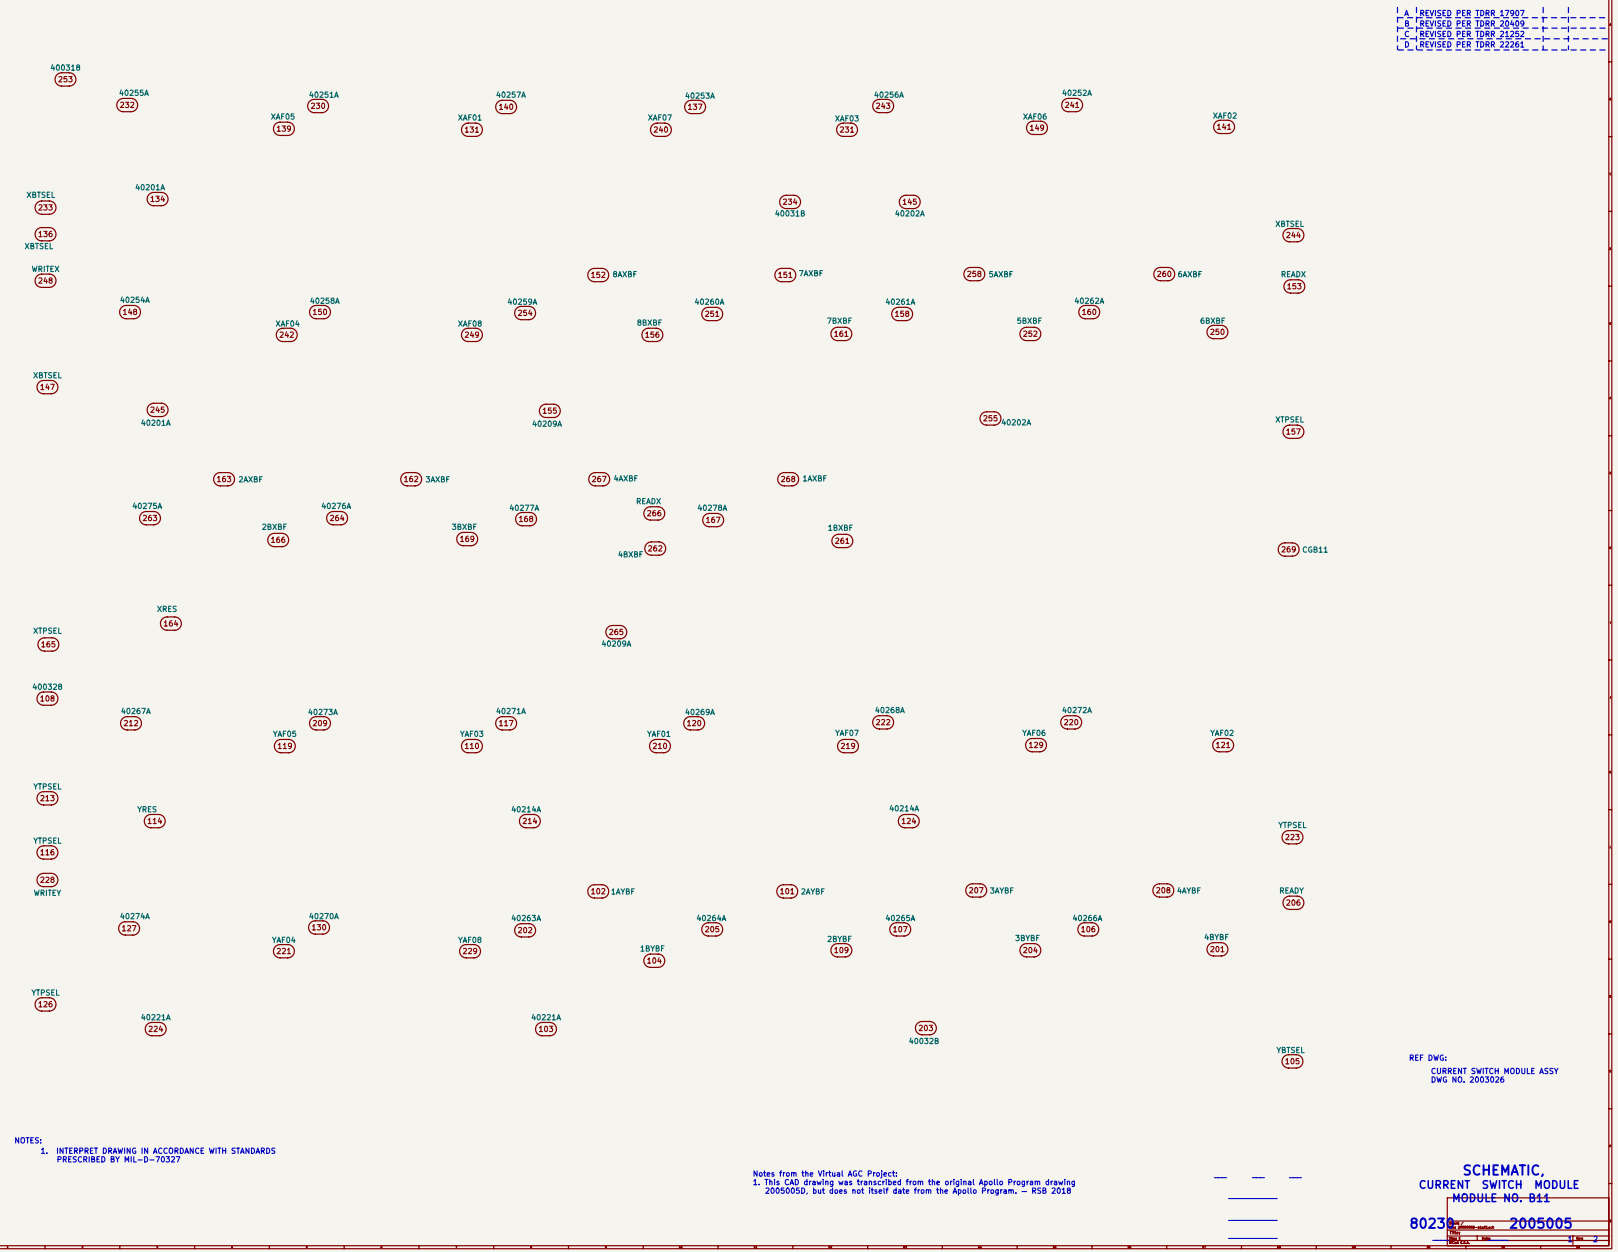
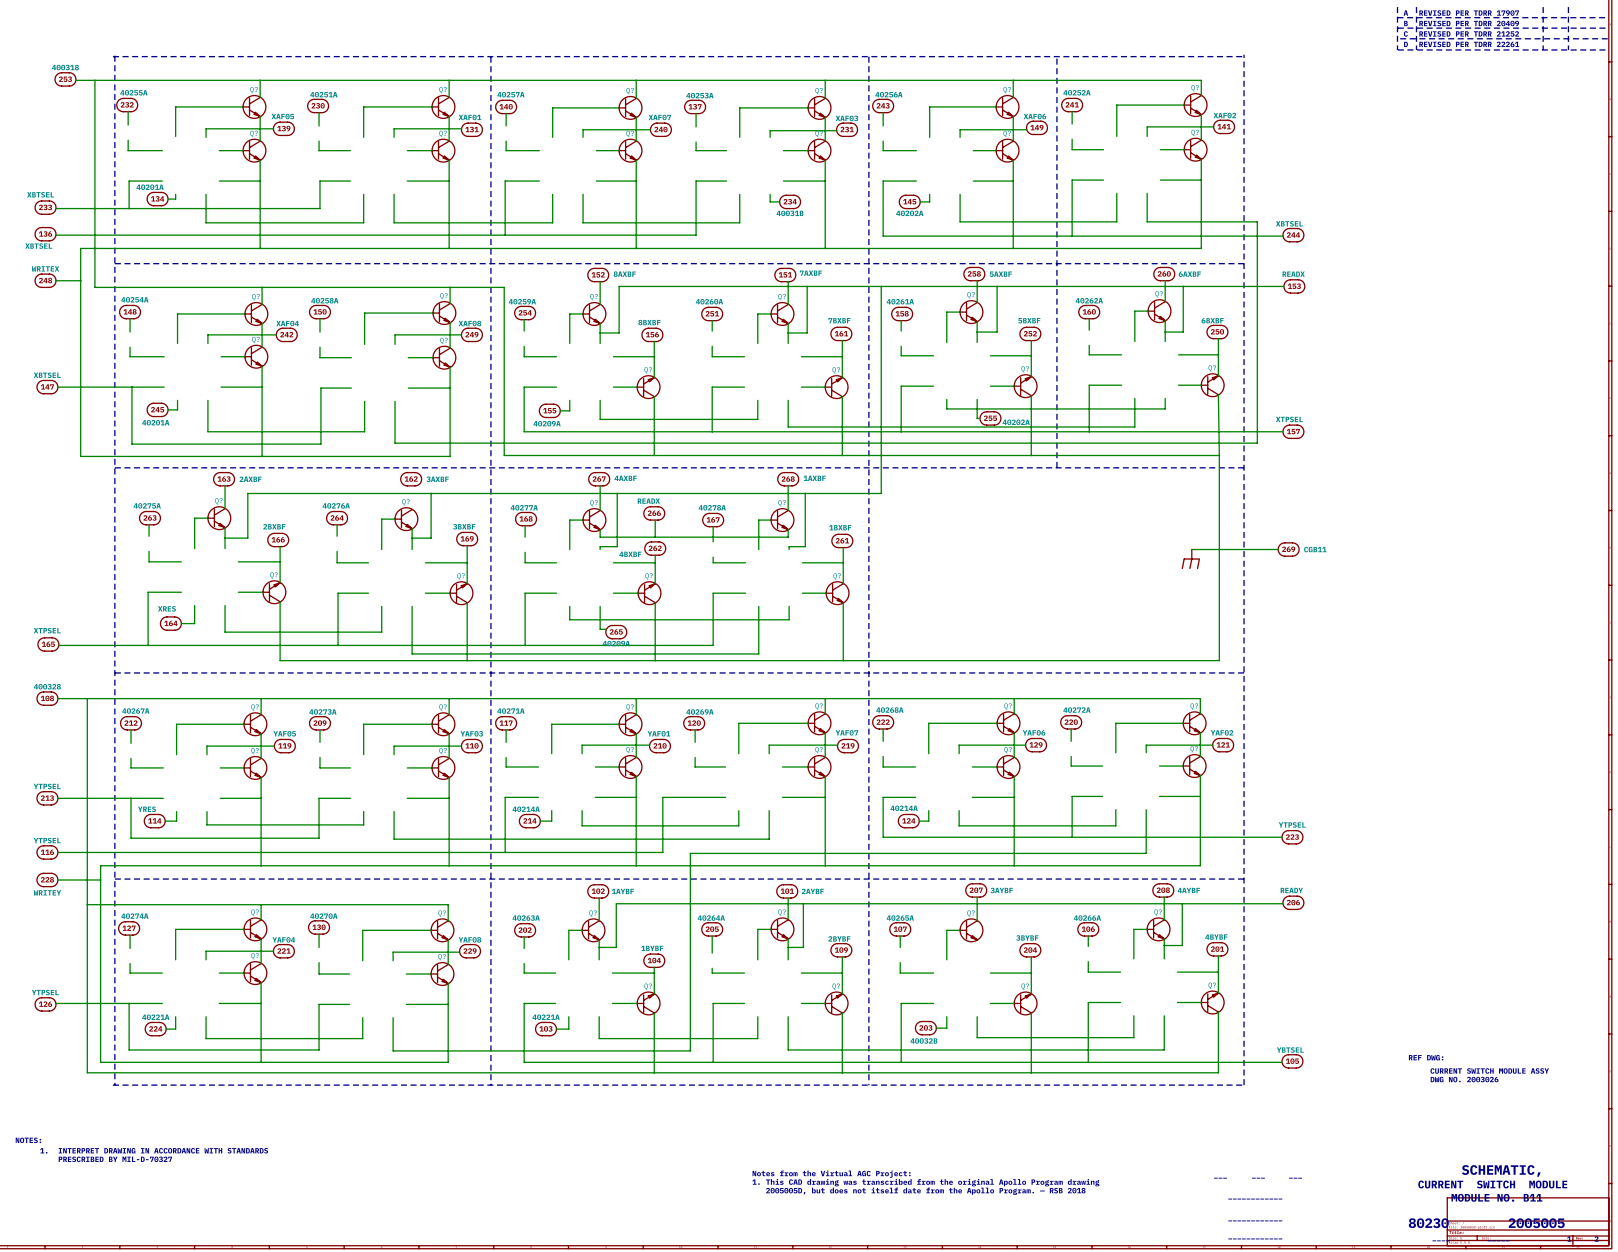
line: none -> (1244, 54) (1244, 1085) (112, 1085)
line: none -> (114, 55) (114, 1085)
line: none -> (112, 56) (1244, 56)
line: none -> (490, 56) (490, 1085)
line: none -> (868, 56) (868, 1085)
line: none -> (1056, 56) (1056, 467)
wire: none -> (75, 80) (1201, 80) (1201, 95)
wire: none -> (94, 80) (94, 287) (504, 287) (504, 455) (1219, 455)
wire: none -> (260, 80) (260, 97)
wire: none -> (449, 80) (449, 97)
wire: none -> (636, 80) (636, 98)
wire: none -> (825, 80) (825, 98)
wire: none -> (1013, 80) (1013, 97)
wire: none -> (1184, 105) (1116, 105) (1116, 136)
part: none -> (1195, 105)
wire: none -> (243, 106) (175, 106) (175, 136)
part: none -> (254, 106)
wire: none -> (432, 106) (363, 106) (363, 137)
part: none -> (443, 106)
wire: none -> (996, 106) (929, 106) (929, 137)
part: none -> (1007, 106)
wire: none -> (619, 107) (552, 107) (552, 137)
part: none -> (630, 107)
wire: none -> (808, 107) (739, 107) (739, 137)
part: none -> (819, 107)
wire: none -> (128, 111) (128, 125)
wire: none -> (1072, 111) (1072, 124)
wire: none -> (319, 112) (319, 125)
wire: none -> (883, 112) (883, 125)
wire: none -> (506, 113) (506, 125)
wire: none -> (696, 113) (696, 126)
wire: none -> (1201, 114) (1201, 140)
wire: none -> (260, 116) (260, 141)
wire: none -> (449, 116) (449, 141)
wire: none -> (1013, 116) (1013, 129)
wire: none -> (636, 117) (636, 141)
wire: none -> (825, 117) (825, 141)
wire: none -> (1213, 126) (1147, 126) (1147, 136)
wire: none -> (273, 128) (206, 128) (206, 137)
wire: none -> (461, 128) (394, 128) (394, 137)
wire: none -> (650, 129) (583, 129) (583, 137)
wire: none -> (1026, 129) (960, 129) (960, 137)
wire: none -> (836, 130) (770, 130) (770, 137)
wire: none -> (1013, 130) (1013, 141)
wire: none -> (1072, 139) (1072, 149) (1103, 149)
wire: none -> (128, 140) (128, 150) (162, 150)
wire: none -> (319, 141) (319, 150) (350, 150)
wire: none -> (506, 141) (506, 150) (539, 150)
wire: none -> (883, 141) (883, 150) (916, 150)
wire: none -> (696, 142) (696, 150) (726, 150)
wire: none -> (1160, 149) (1184, 149)
part: none -> (1195, 149)
wire: none -> (219, 150) (243, 150)
part: none -> (254, 150)
wire: none -> (407, 150) (432, 150)
part: none -> (443, 150)
wire: none -> (596, 150) (619, 150)
part: none -> (630, 150)
wire: none -> (783, 150) (808, 150)
part: none -> (819, 150)
wire: none -> (973, 150) (996, 150)
part: none -> (1007, 150)
wire: none -> (1201, 159) (1201, 248) (80, 248) (80, 456) (450, 456) (450, 367)
wire: none -> (260, 160) (260, 248)
wire: none -> (449, 160) (449, 248)
wire: none -> (636, 160) (636, 248)
wire: none -> (825, 160) (825, 248)
wire: none -> (1013, 160) (1013, 248)
wire: none -> (1103, 180) (1072, 180) (1072, 236)
wire: none -> (1160, 180) (1201, 180)
wire: none -> (162, 181) (129, 181) (129, 208)
wire: none -> (219, 181) (260, 181)
wire: none -> (350, 181) (319, 181) (319, 208) (55, 208)
wire: none -> (407, 181) (449, 181)
wire: none -> (539, 181) (505, 181) (505, 235)
wire: none -> (596, 181) (636, 181)
wire: none -> (726, 181) (696, 181) (696, 235) (55, 235)
wire: none -> (783, 181) (825, 181)
wire: none -> (916, 181) (883, 181) (883, 236) (1282, 236)
wire: none -> (973, 181) (1013, 181)
wire: none -> (1116, 193) (1116, 221) (960, 221) (960, 194)
wire: none -> (1147, 193) (1147, 221) (1257, 221) (1257, 443) (395, 443) (395, 401)
wire: none -> (175, 194) (175, 199) (168, 199)
wire: none -> (206, 194) (206, 222) (363, 222) (363, 194)
wire: none -> (394, 194) (394, 222) (552, 222) (552, 194)
wire: none -> (583, 194) (583, 222) (739, 222) (739, 194)
wire: none -> (770, 194) (770, 201) (779, 201)
wire: none -> (929, 194) (929, 201) (920, 201)
line: none -> (114, 263) (1244, 263)
wire: none -> (55, 280) (80, 280)
wire: none -> (977, 280) (977, 302)
wire: none -> (1165, 280) (1165, 301)
wire: none -> (600, 281) (600, 304)
wire: none -> (787, 281) (788, 304)
wire: none -> (807, 286) (807, 332) (788, 332)
wire: none -> (881, 286) (881, 493) (247, 493) (247, 538) (225, 538)
wire: none -> (997, 286) (997, 332) (977, 332)
wire: none -> (1183, 286) (1183, 332) (1165, 332)
wire: none -> (1283, 286) (619, 286) (619, 332) (600, 332)
wire: none -> (262, 287) (262, 304)
wire: none -> (450, 287) (450, 303)
wire: none -> (1148, 311) (1134, 311) (1134, 341)
part: none -> (1159, 311)
wire: none -> (960, 312) (946, 312) (946, 342)
part: none -> (971, 312)
wire: none -> (244, 313) (177, 313) (177, 343)
part: none -> (256, 313)
wire: none -> (433, 313) (364, 313) (364, 344)
part: none -> (444, 313)
wire: none -> (583, 313) (569, 313) (569, 343)
part: none -> (594, 313)
wire: none -> (771, 313) (757, 313) (757, 343)
part: none -> (782, 313)
wire: none -> (130, 318) (130, 332)
wire: none -> (319, 318) (319, 332)
wire: none -> (1089, 318) (1089, 330)
wire: none -> (524, 319) (524, 331)
wire: none -> (712, 320) (712, 331)
wire: none -> (901, 320) (901, 331)
wire: none -> (1165, 320) (1165, 341)
wire: none -> (977, 321) (977, 342)
wire: none -> (450, 322) (450, 348)
wire: none -> (262, 323) (262, 347)
wire: none -> (600, 323) (600, 343)
wire: none -> (788, 323) (788, 343)
wire: none -> (276, 334) (207, 334) (207, 343)
wire: none -> (461, 334) (395, 334) (395, 344)
wire: none -> (1218, 338) (1218, 375)
wire: none -> (842, 340) (842, 377)
wire: none -> (1031, 340) (1031, 376)
wire: none -> (654, 341) (654, 377)
wire: none -> (1089, 345) (1089, 354) (1121, 354)
wire: none -> (524, 346) (524, 356) (556, 356)
wire: none -> (712, 346) (712, 356) (744, 356)
wire: none -> (901, 346) (901, 355) (933, 355)
wire: none -> (130, 347) (130, 356) (164, 356)
wire: none -> (319, 347) (319, 357) (351, 357)
wire: none -> (1178, 354) (1218, 354)
wire: none -> (990, 355) (1031, 355)
wire: none -> (221, 356) (244, 356)
part: none -> (256, 356)
wire: none -> (613, 356) (654, 356)
wire: none -> (801, 356) (842, 356)
wire: none -> (408, 357) (433, 357)
part: none -> (444, 357)
wire: none -> (262, 366) (262, 456)
wire: none -> (1121, 385) (1089, 385) (1089, 431)
wire: none -> (1178, 385) (1201, 385)
part: none -> (1212, 385)
wire: none -> (933, 386) (901, 386) (901, 431)
wire: none -> (990, 386) (1014, 386)
part: none -> (1025, 386)
wire: none -> (57, 387) (164, 387)
wire: none -> (131, 387) (131, 444) (320, 444) (320, 388) (351, 388)
wire: none -> (221, 387) (262, 387)
wire: none -> (556, 387) (524, 387) (524, 431) (1282, 431)
wire: none -> (613, 387) (637, 387)
part: none -> (648, 387)
wire: none -> (744, 387) (712, 387) (712, 431)
wire: none -> (801, 387) (825, 387)
part: none -> (836, 387)
wire: none -> (408, 388) (450, 388)
wire: none -> (1218, 394) (1219, 455)
wire: none -> (1031, 395) (1031, 455)
wire: none -> (654, 396) (654, 455)
wire: none -> (842, 396) (842, 455)
wire: none -> (1134, 398) (1134, 427) (788, 427) (788, 400)
wire: none -> (1165, 398) (1165, 408) (946, 408) (946, 399)
wire: none -> (977, 399) (977, 418) (979, 418)
wire: none -> (177, 400) (177, 409) (168, 409)
wire: none -> (207, 400) (207, 431) (364, 431) (364, 401)
wire: none -> (569, 400) (569, 410) (560, 410)
wire: none -> (600, 400) (600, 419) (757, 419) (757, 400)
wire: none -> (1219, 455) (1219, 660) (280, 660) (280, 601)
line: none -> (114, 467) (1244, 467)
wire: none -> (225, 485) (225, 508)
wire: none -> (600, 485) (600, 510)
wire: none -> (788, 485) (788, 510)
wire: none -> (431, 493) (431, 538) (412, 538)
wire: none -> (617, 493) (617, 546) (600, 546) (600, 549)
wire: none -> (805, 493) (805, 546) (789, 546) (789, 549)
wire: none -> (207, 518) (194, 518) (194, 548)
part: none -> (219, 518)
wire: none -> (395, 519) (381, 519) (381, 549)
part: none -> (406, 519)
wire: none -> (583, 520) (569, 520) (569, 549)
part: none -> (594, 520)
wire: none -> (655, 520) (655, 537)
wire: none -> (771, 520) (758, 520) (758, 549)
part: none -> (782, 520)
wire: none -> (149, 524) (149, 536)
wire: none -> (337, 524) (337, 536)
wire: none -> (525, 525) (525, 537)
wire: none -> (713, 526) (713, 541)
wire: none -> (225, 527) (225, 548)
wire: none -> (412, 528) (412, 549)
wire: none -> (600, 529) (600, 537) (788, 537) (788, 529)
wire: none -> (467, 545) (467, 583)
wire: none -> (280, 546) (280, 582)
wire: none -> (843, 547) (843, 583)
wire: none -> (1191, 549) (1278, 549)
wire: none -> (149, 551) (149, 561) (181, 561)
wire: none -> (337, 551) (337, 562) (368, 562)
wire: none -> (525, 552) (525, 562) (556, 562)
wire: none -> (655, 555) (655, 583)
wire: none -> (713, 557) (713, 562) (745, 562)
part: none -> (1190, 559)
wire: none -> (238, 561) (280, 561)
wire: none -> (425, 562) (467, 562)
wire: none -> (613, 562) (655, 562)
wire: none -> (802, 562) (843, 562)
wire: none -> (181, 592) (148, 592) (148, 645)
wire: none -> (238, 592) (263, 592)
part: none -> (274, 592)
wire: none -> (368, 593) (338, 593) (338, 645)
wire: none -> (425, 593) (450, 593)
part: none -> (461, 593)
wire: none -> (556, 593) (525, 593) (525, 645)
wire: none -> (613, 593) (638, 593)
part: none -> (649, 593)
wire: none -> (745, 593) (713, 593) (713, 645) (58, 645)
wire: none -> (802, 593) (826, 593)
part: none -> (837, 593)
wire: none -> (467, 602) (467, 660)
wire: none -> (655, 602) (655, 660)
wire: none -> (843, 602) (843, 660)
wire: none -> (194, 605) (194, 623) (181, 623)
wire: none -> (225, 605) (225, 632) (381, 632) (381, 606)
wire: none -> (412, 606) (412, 653) (758, 653) (758, 606)
wire: none -> (569, 606) (569, 619) (789, 619) (789, 606)
wire: none -> (600, 606) (600, 629) (605, 629)
line: none -> (114, 672) (1244, 672)
wire: none -> (57, 698) (1200, 698) (1200, 713)
wire: none -> (87, 698) (87, 1072) (1218, 1072) (1218, 1012)
wire: none -> (261, 698) (261, 714)
wire: none -> (449, 698) (449, 714)
wire: none -> (636, 698) (636, 714)
wire: none -> (825, 698) (825, 713)
wire: none -> (1014, 698) (1014, 713)
wire: none -> (808, 723) (738, 723) (738, 753)
part: none -> (819, 723)
wire: none -> (997, 723) (928, 723) (928, 753)
part: none -> (1008, 723)
wire: none -> (1183, 723) (1115, 723) (1115, 752)
part: none -> (1194, 723)
wire: none -> (244, 724) (176, 724) (176, 754)
part: none -> (255, 724)
wire: none -> (432, 724) (363, 724) (363, 754)
part: none -> (443, 724)
wire: none -> (619, 724) (551, 724) (551, 753)
part: none -> (630, 724)
wire: none -> (131, 729) (131, 743)
wire: none -> (319, 729) (319, 742)
wire: none -> (506, 729) (506, 742)
wire: none -> (695, 729) (695, 742)
wire: none -> (883, 729) (883, 741)
wire: none -> (1071, 729) (1071, 741)
wire: none -> (825, 732) (825, 757)
wire: none -> (1014, 732) (1014, 757)
wire: none -> (1200, 732) (1200, 756)
wire: none -> (261, 733) (261, 758)
wire: none -> (449, 733) (449, 758)
wire: none -> (636, 733) (636, 757)
wire: none -> (649, 745) (582, 745) (582, 753)
wire: none -> (837, 745) (769, 745) (769, 753)
wire: none -> (1025, 745) (959, 745) (959, 753)
wire: none -> (1212, 745) (1146, 745) (1146, 752)
wire: none -> (274, 746) (206, 746) (206, 754)
wire: none -> (461, 746) (394, 746) (394, 754)
wire: none -> (883, 756) (883, 766) (915, 766)
wire: none -> (1071, 756) (1071, 766) (1102, 766)
wire: none -> (319, 757) (319, 767) (350, 767)
wire: none -> (506, 757) (506, 766) (538, 766)
wire: none -> (695, 757) (695, 766) (725, 766)
wire: none -> (131, 758) (131, 767) (163, 767)
wire: none -> (595, 766) (619, 766)
part: none -> (630, 766)
wire: none -> (782, 766) (808, 766)
part: none -> (819, 766)
wire: none -> (972, 766) (997, 766)
part: none -> (1008, 766)
wire: none -> (1159, 766) (1183, 766)
part: none -> (1194, 766)
wire: none -> (220, 767) (244, 767)
part: none -> (255, 767)
wire: none -> (407, 767) (432, 767)
part: none -> (443, 767)
wire: none -> (1200, 775) (1200, 865) (100, 865) (100, 1062) (448, 1062) (448, 983)
wire: none -> (636, 776) (636, 865)
wire: none -> (825, 776) (825, 865)
wire: none -> (1014, 776) (1014, 865)
wire: none -> (261, 777) (261, 865)
wire: none -> (449, 777) (449, 865)
wire: none -> (1102, 796) (1072, 796) (1072, 837)
wire: none -> (1159, 796) (1200, 796)
wire: none -> (538, 797) (505, 797) (505, 852)
wire: none -> (595, 797) (636, 797)
wire: none -> (725, 797) (662, 797) (662, 852) (57, 852)
wire: none -> (782, 797) (825, 797)
wire: none -> (915, 797) (883, 797) (883, 837) (1282, 837)
wire: none -> (972, 797) (1014, 797)
wire: none -> (57, 798) (163, 798)
wire: none -> (131, 798) (131, 838) (319, 838) (319, 798) (350, 798)
wire: none -> (220, 798) (261, 798)
wire: none -> (407, 798) (449, 798)
wire: none -> (1115, 809) (1115, 825) (959, 825) (959, 810)
wire: none -> (1146, 809) (1146, 853) (690, 853) (690, 1050) (393, 1050) (393, 1017)
wire: none -> (551, 810) (551, 821) (540, 821)
wire: none -> (582, 810) (582, 825) (738, 825) (738, 810)
wire: none -> (769, 810) (769, 839) (394, 839) (394, 811)
wire: none -> (928, 810) (928, 821) (919, 821)
wire: none -> (176, 811) (176, 821) (165, 821)
wire: none -> (206, 811) (206, 824) (363, 824) (363, 811)
line: none -> (114, 879) (1244, 879)
wire: none -> (57, 880) (100, 880)
wire: none -> (977, 897) (977, 920)
wire: none -> (1164, 897) (1164, 919)
wire: none -> (599, 898) (599, 920)
wire: none -> (788, 898) (788, 918)
wire: none -> (803, 903) (803, 947) (788, 947)
wire: none -> (1182, 903) (1182, 945) (1164, 945)
wire: none -> (1282, 903) (616, 903) (616, 947) (599, 947)
wire: none -> (87, 904) (448, 904) (448, 920)
wire: none -> (261, 904) (261, 919)
wire: none -> (244, 929) (175, 929) (175, 959)
part: none -> (255, 929)
wire: none -> (771, 929) (757, 929) (757, 959)
part: none -> (782, 929)
wire: none -> (1147, 929) (1133, 929) (1133, 958)
part: none -> (1158, 929)
wire: none -> (431, 930) (362, 930) (362, 960)
part: none -> (442, 930)
wire: none -> (582, 930) (568, 930) (568, 959)
part: none -> (593, 930)
wire: none -> (960, 930) (946, 930) (946, 959)
part: none -> (971, 930)
wire: none -> (319, 934) (319, 947)
wire: none -> (130, 935) (130, 948)
wire: none -> (524, 936) (524, 948)
wire: none -> (712, 936) (712, 953)
wire: none -> (900, 936) (900, 947)
wire: none -> (1088, 936) (1088, 946)
wire: none -> (261, 938) (261, 963)
wire: none -> (788, 938) (788, 959)
wire: none -> (1164, 938) (1164, 958)
wire: none -> (448, 939) (448, 964)
wire: none -> (599, 939) (599, 959)
wire: none -> (273, 951) (206, 951) (206, 959)
wire: none -> (459, 952) (393, 952) (393, 960)
wire: none -> (1218, 955) (1218, 993)
wire: none -> (842, 956) (842, 993)
wire: none -> (1031, 956) (1031, 993)
wire: none -> (1088, 961) (1088, 972) (1120, 972)
wire: none -> (319, 962) (319, 974) (349, 974)
wire: none -> (900, 962) (900, 973) (933, 973)
wire: none -> (130, 963) (130, 973) (162, 973)
wire: none -> (524, 963) (524, 973) (555, 973)
wire: none -> (654, 967) (654, 993)
wire: none -> (712, 968) (712, 973) (744, 973)
wire: none -> (1177, 972) (1218, 972)
wire: none -> (219, 973) (244, 973)
part: none -> (255, 973)
wire: none -> (612, 973) (654, 973)
wire: none -> (801, 973) (842, 973)
wire: none -> (990, 973) (1031, 973)
wire: none -> (406, 974) (431, 974)
part: none -> (442, 974)
wire: none -> (261, 982) (261, 1062)
wire: none -> (1120, 1002) (1088, 1002) (1088, 1062)
wire: none -> (1177, 1002) (1201, 1002)
part: none -> (1212, 1002)
wire: none -> (55, 1003) (162, 1003)
wire: none -> (129, 1003) (129, 1049) (319, 1049) (319, 1004) (349, 1004)
wire: none -> (219, 1003) (261, 1003)
wire: none -> (555, 1003) (524, 1003) (524, 1062) (1282, 1062)
wire: none -> (612, 1003) (637, 1003)
part: none -> (648, 1003)
wire: none -> (744, 1003) (713, 1003) (713, 1062)
wire: none -> (801, 1003) (825, 1003)
part: none -> (836, 1003)
wire: none -> (933, 1003) (901, 1003) (901, 1062)
wire: none -> (990, 1003) (1014, 1003)
part: none -> (1025, 1003)
wire: none -> (406, 1004) (448, 1004)
wire: none -> (654, 1012) (654, 1072)
wire: none -> (842, 1012) (842, 1072)
wire: none -> (1031, 1012) (1031, 1072)
wire: none -> (1133, 1015) (1133, 1037) (977, 1037) (977, 1016)
wire: none -> (1164, 1015) (1164, 1049) (788, 1049) (788, 1016)
wire: none -> (175, 1016) (175, 1029) (166, 1029)
wire: none -> (206, 1016) (206, 1038) (362, 1038) (362, 1017)
wire: none -> (568, 1016) (568, 1029) (556, 1029)
wire: none -> (599, 1016) (599, 1038) (757, 1038) (757, 1016)
wire: none -> (946, 1016) (946, 1028) (936, 1028)

